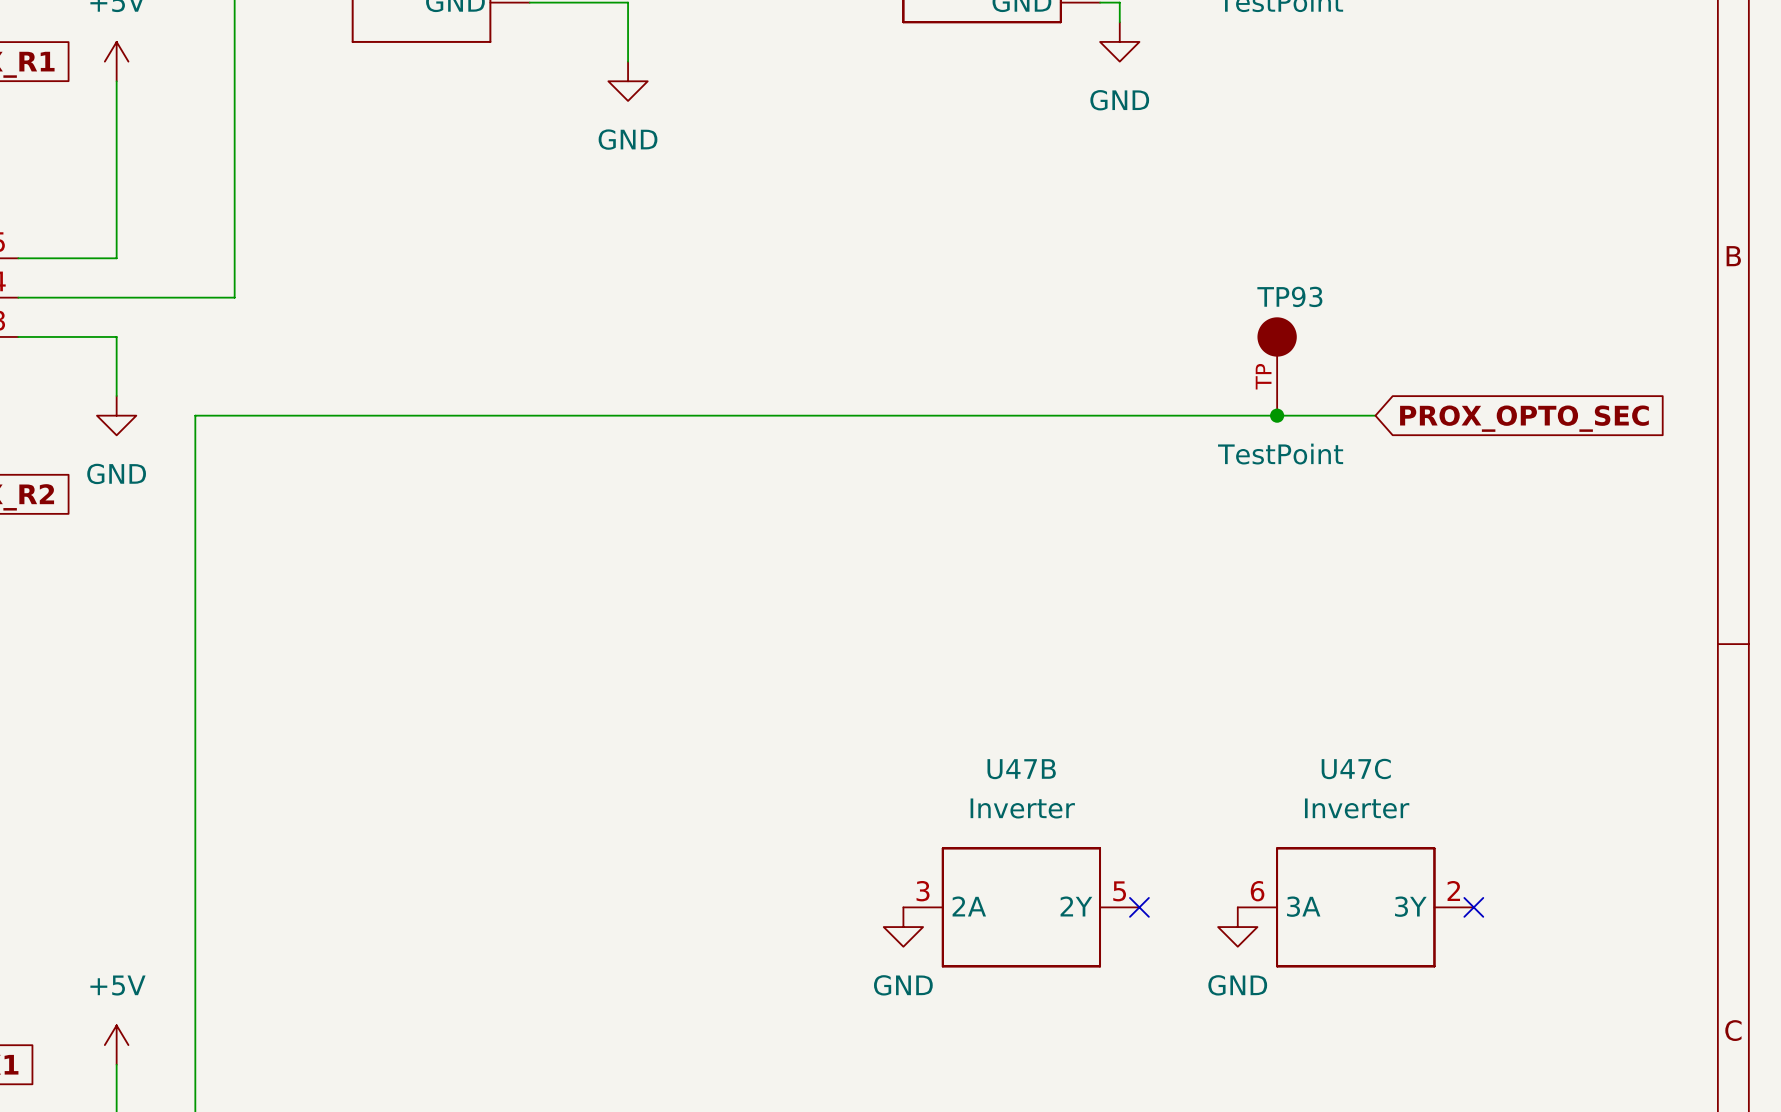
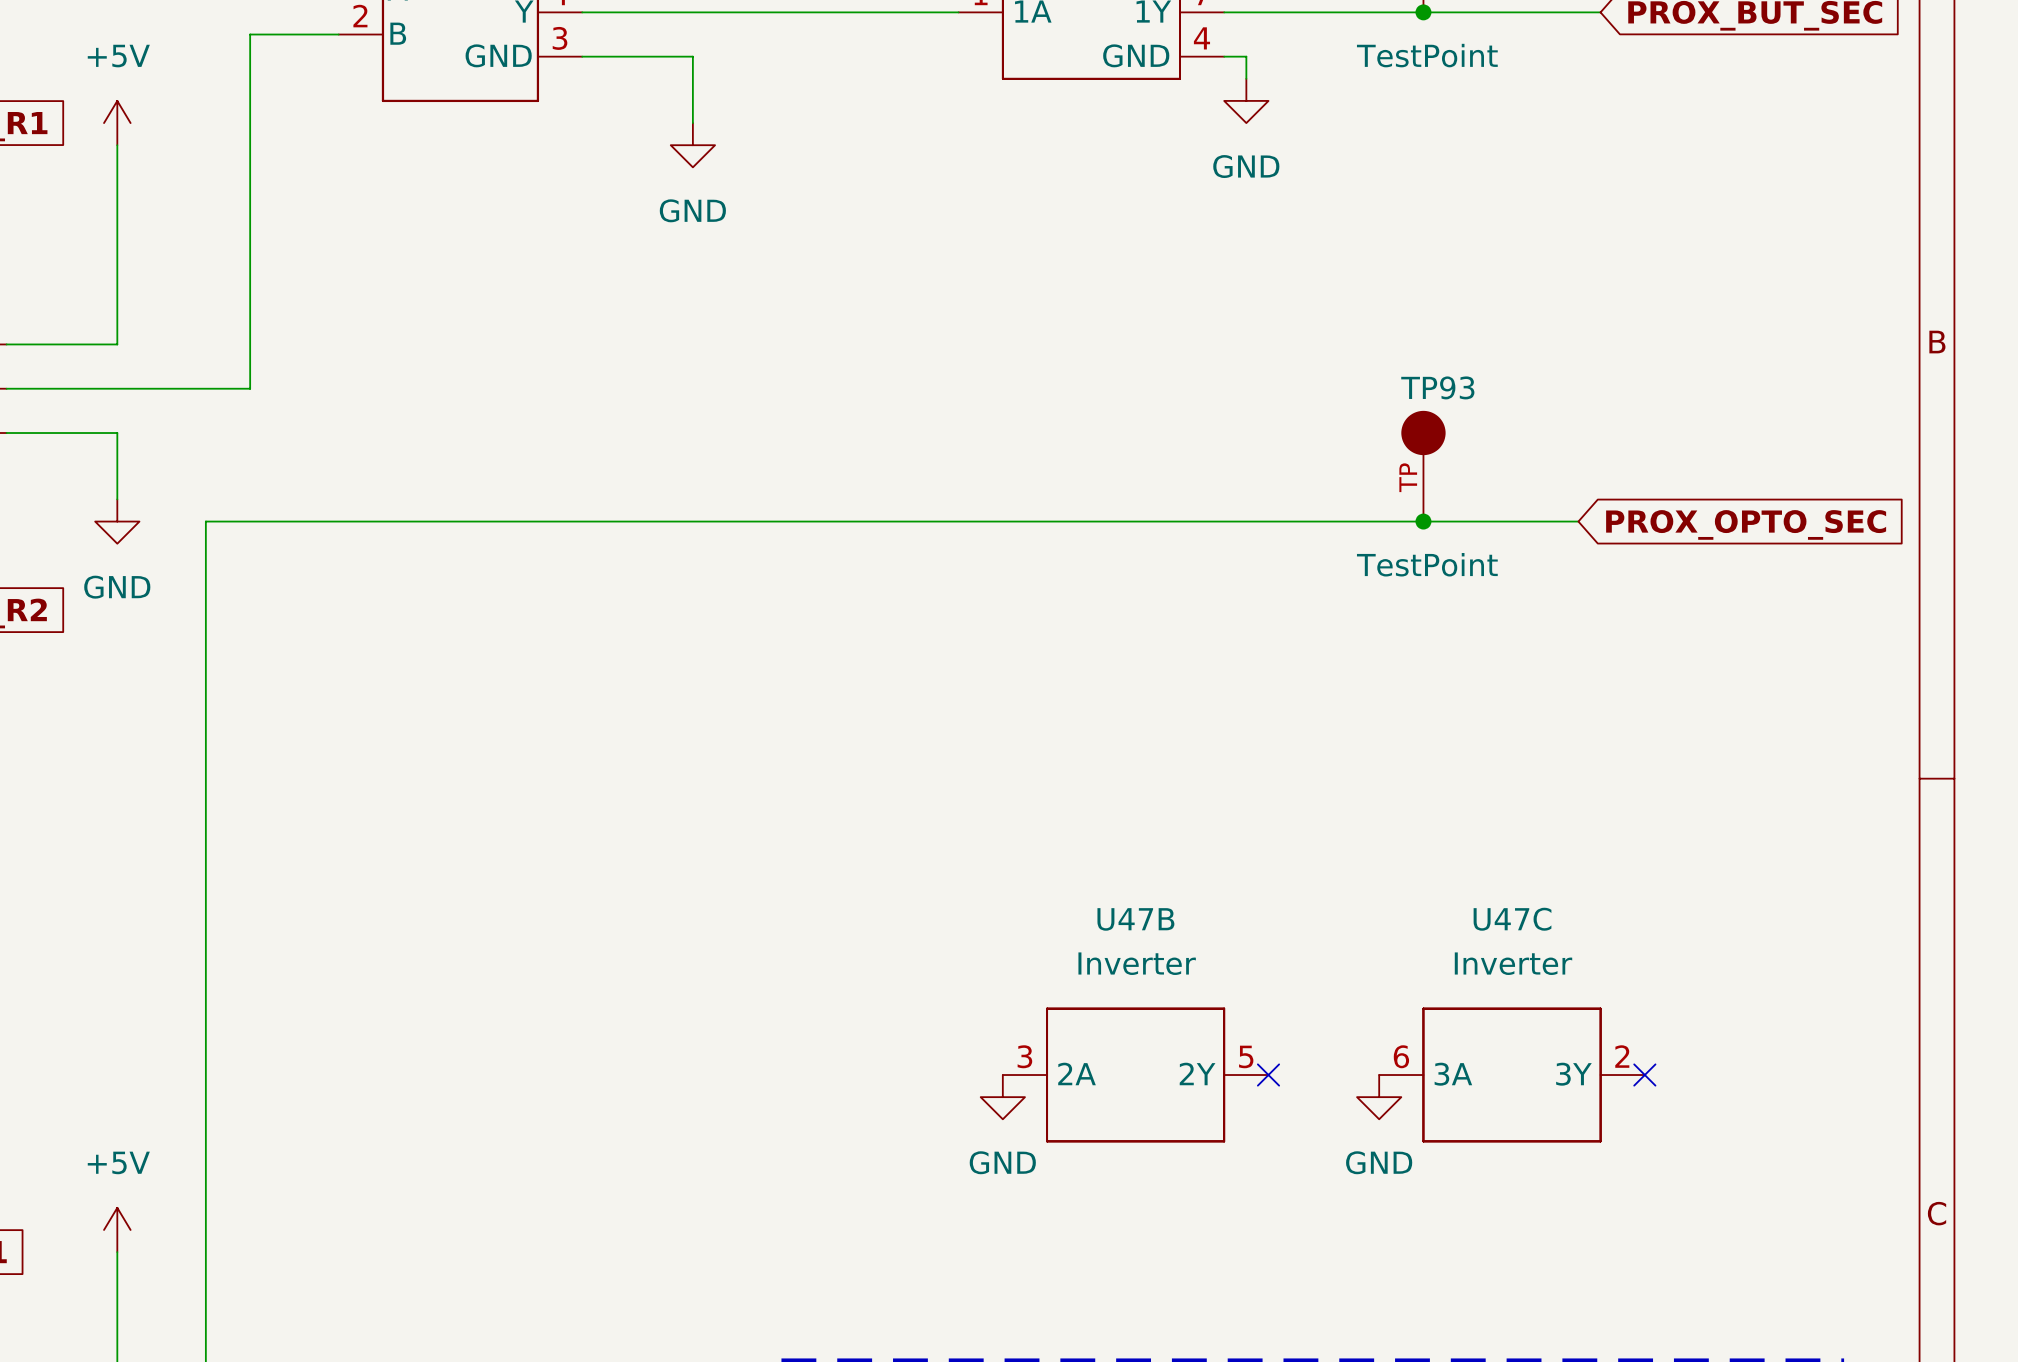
wire: none -> (1534, 521) (1578, 521)
global label position: PROX_OPTO_SEC (1524, 418) -> PROX_OPTO_SEC (1746, 524)

